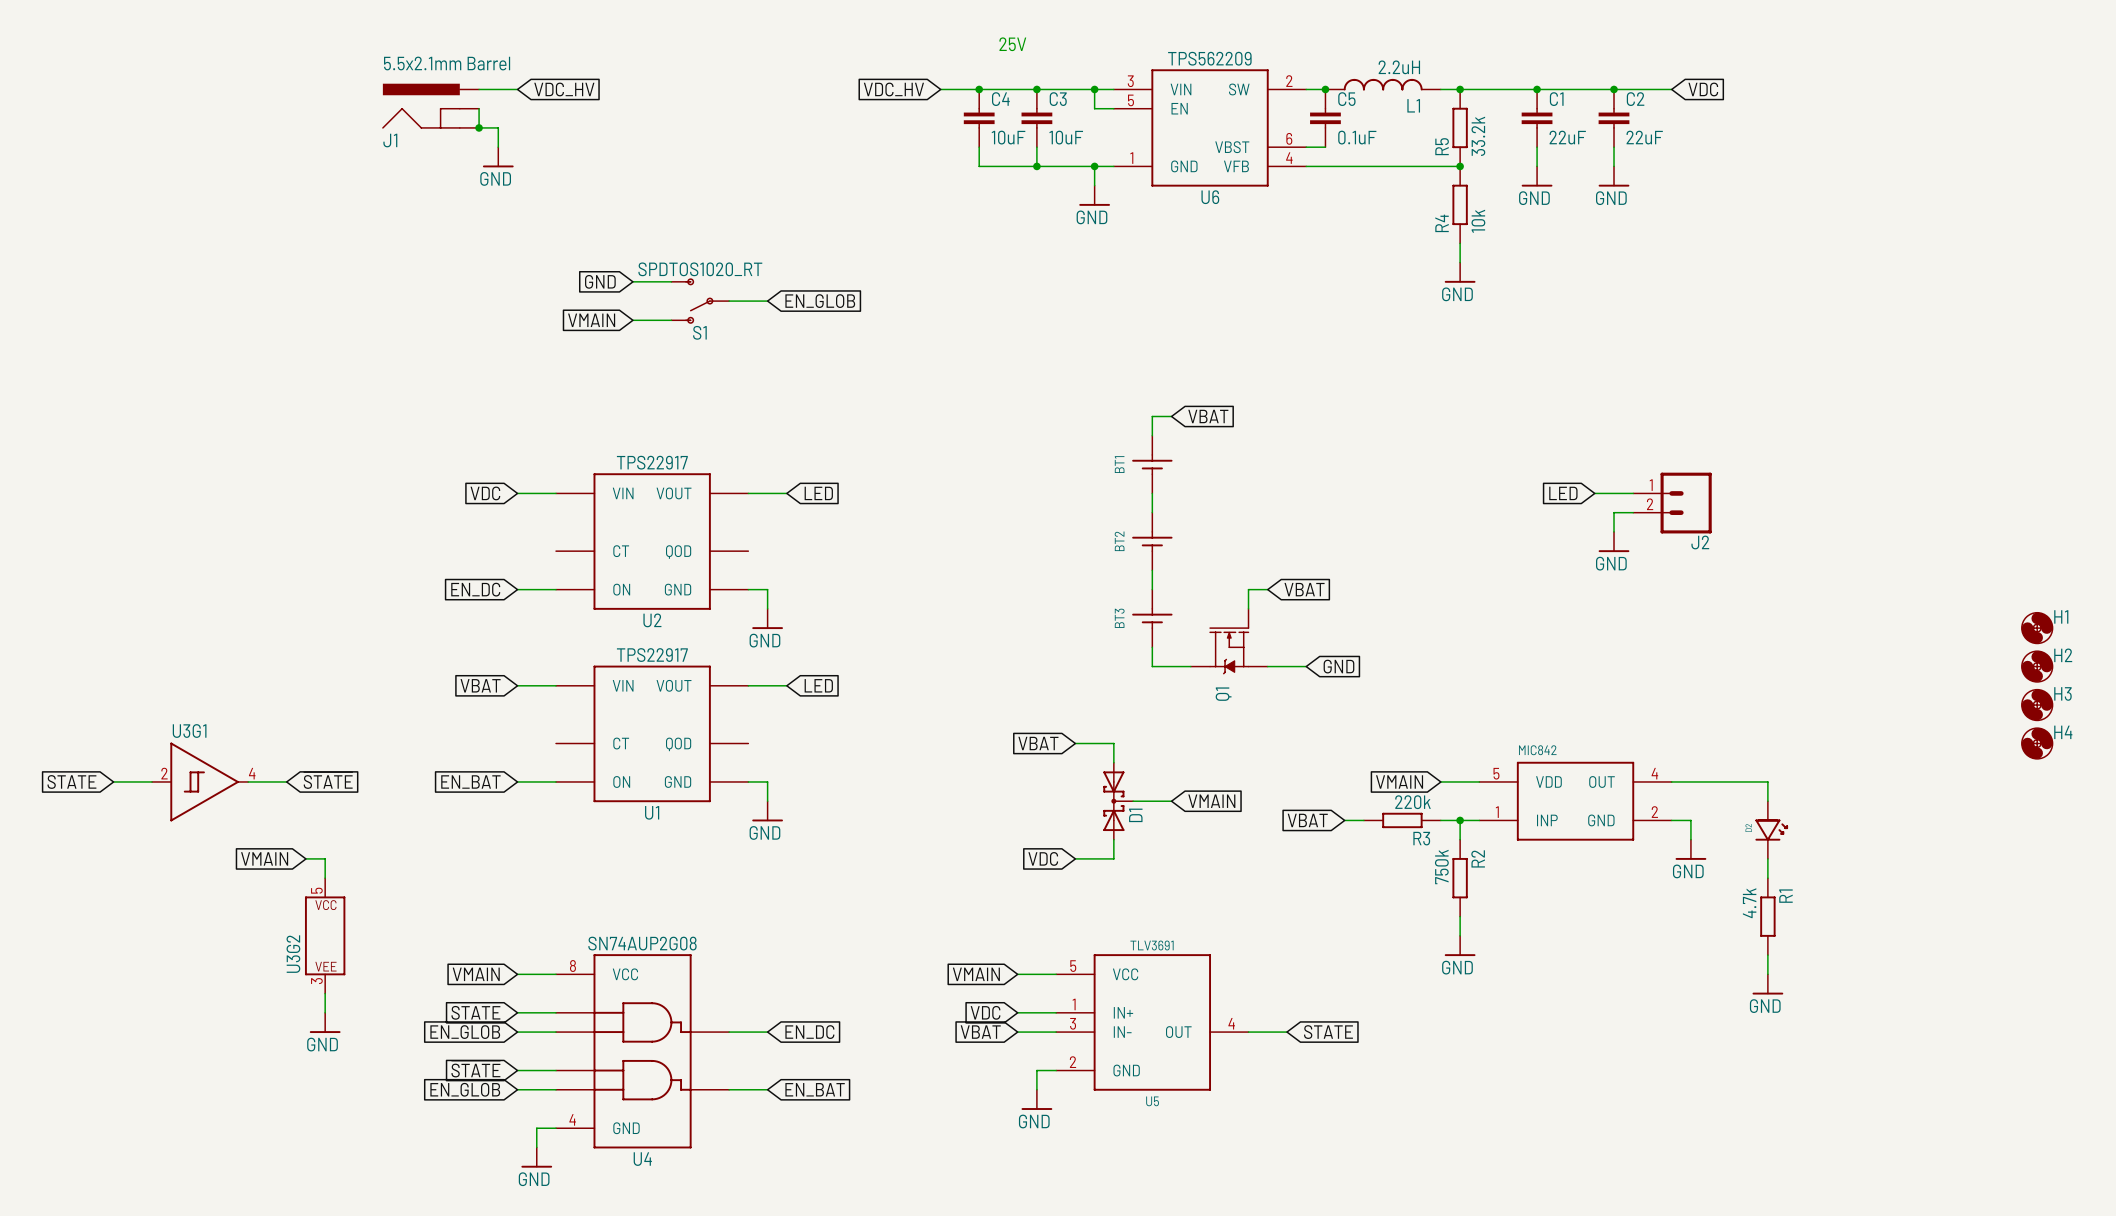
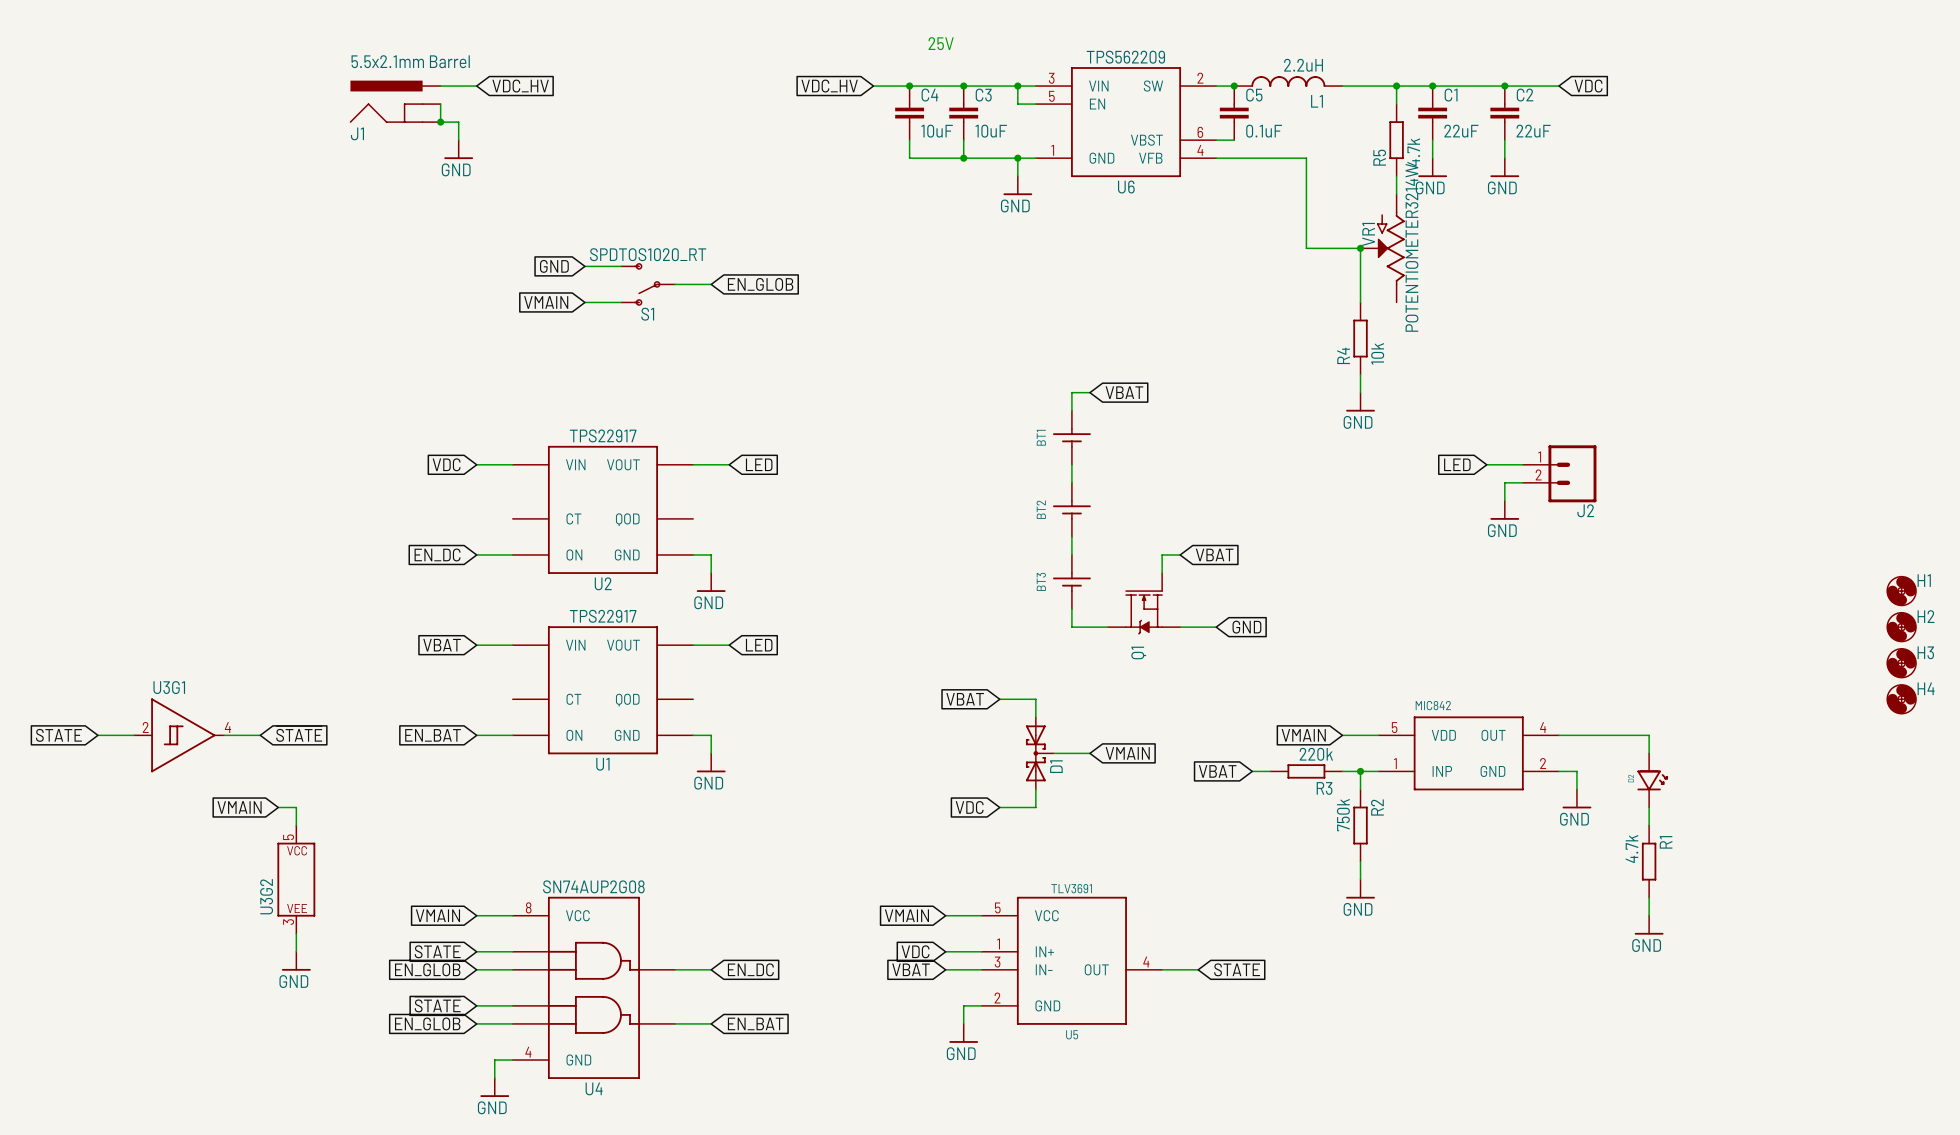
junction position: (1460, 89) -> (1396, 86)
wire: none -> (1396, 86) (1396, 104)
R5 position: (1460, 127) -> (1396, 140)
R5 value: 33.2k (1478, 136) -> 4.7k (1413, 152)
wire: (1402, 166) (1460, 166) -> (1306, 158) (1306, 248) (1360, 248) (1360, 302)
junction: (1460, 166) -> none
R4 position: (1460, 204) -> (1360, 338)
wire: (1460, 243) (1460, 262) -> (1396, 176) (1396, 194)
junction: none -> (1360, 248)
VR1: none -> POTENTIOMETER3214W (1382, 248)
power symbol position: GND (1460, 272) -> GND (1360, 402)
wire: none -> (1360, 374) (1360, 392)

